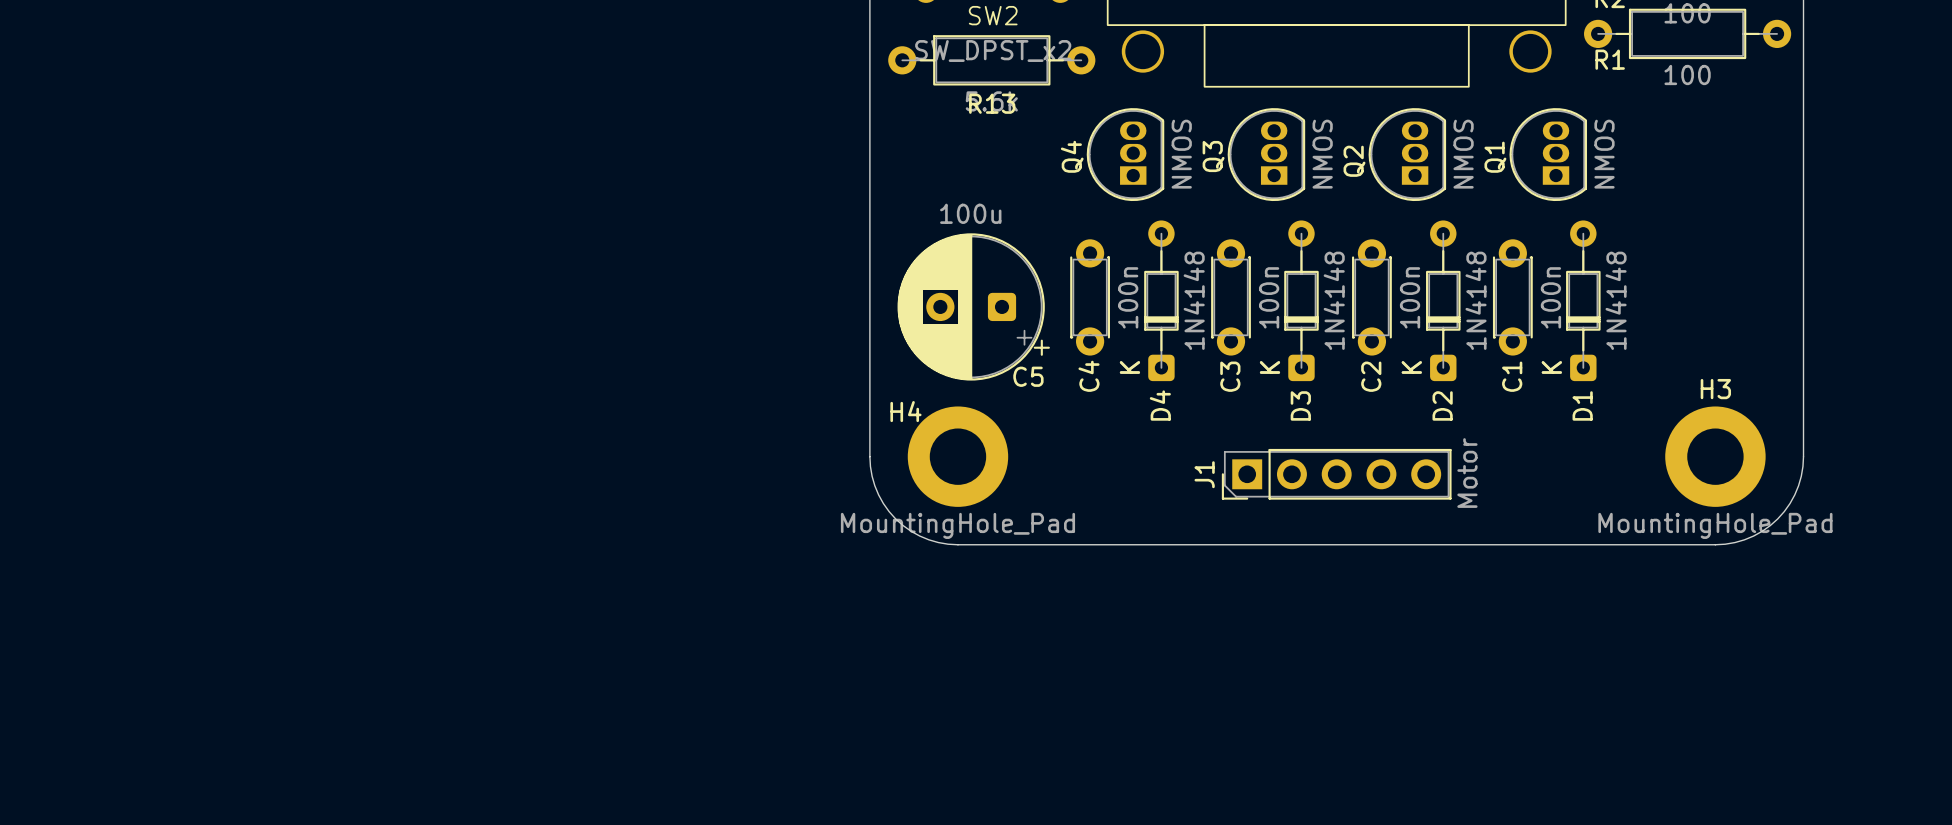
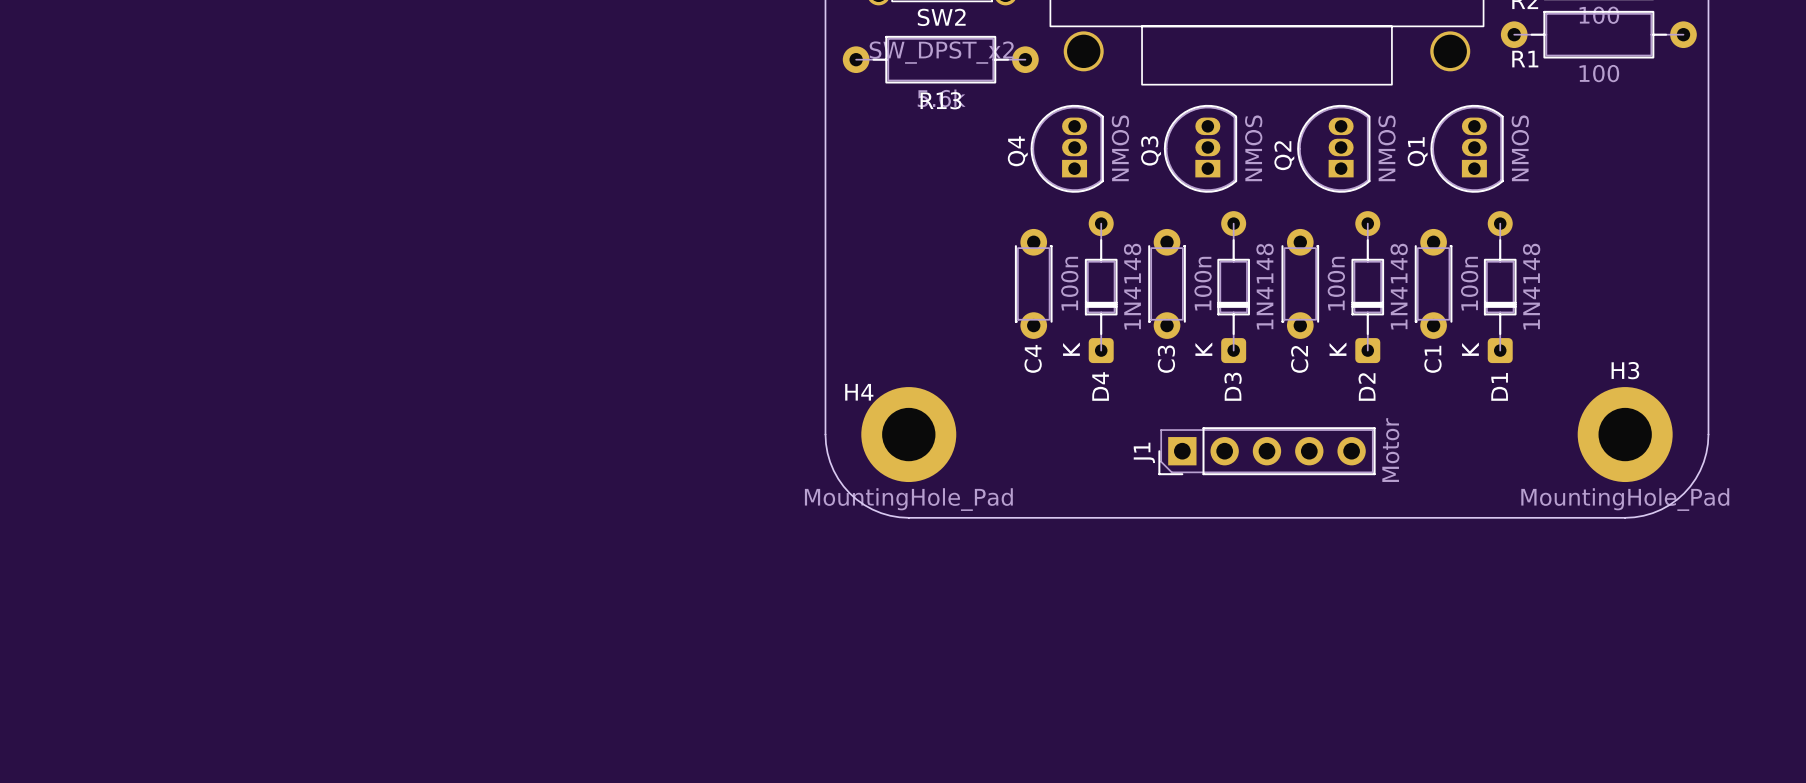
C5: 100u (973, 306) -> none

